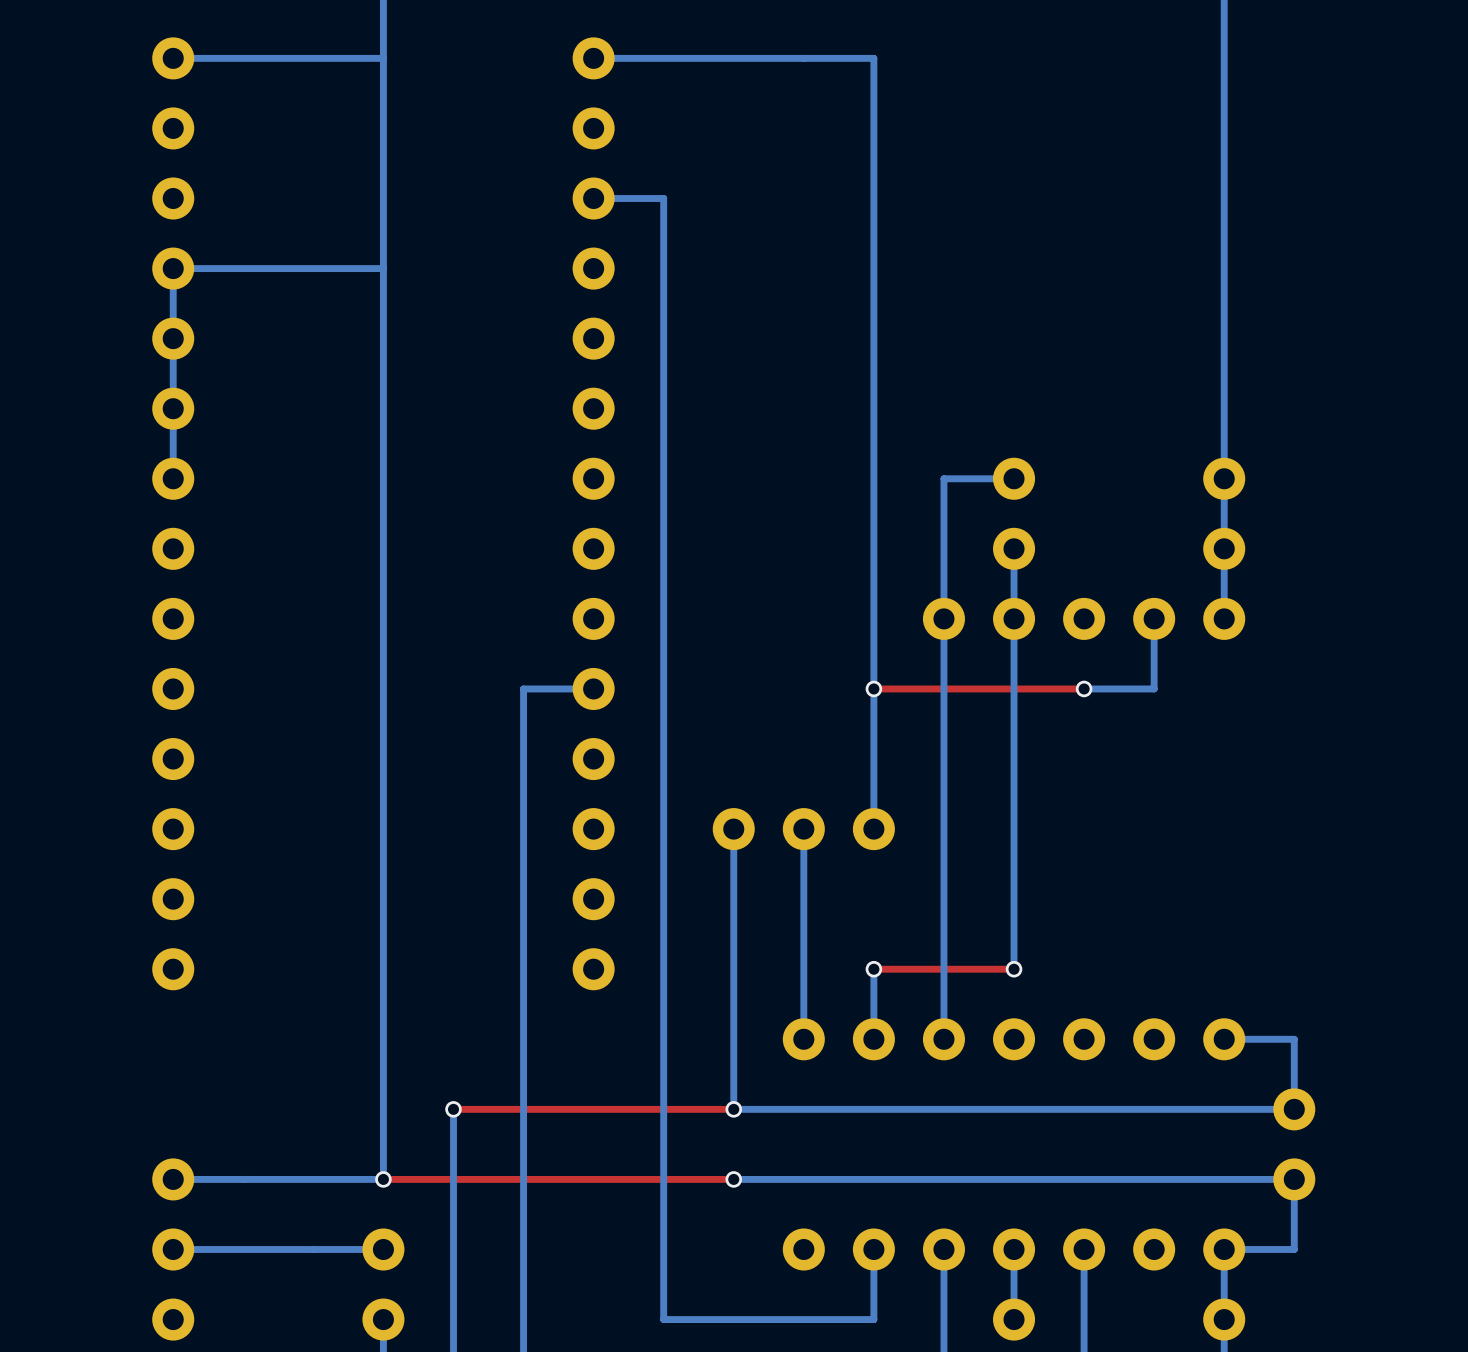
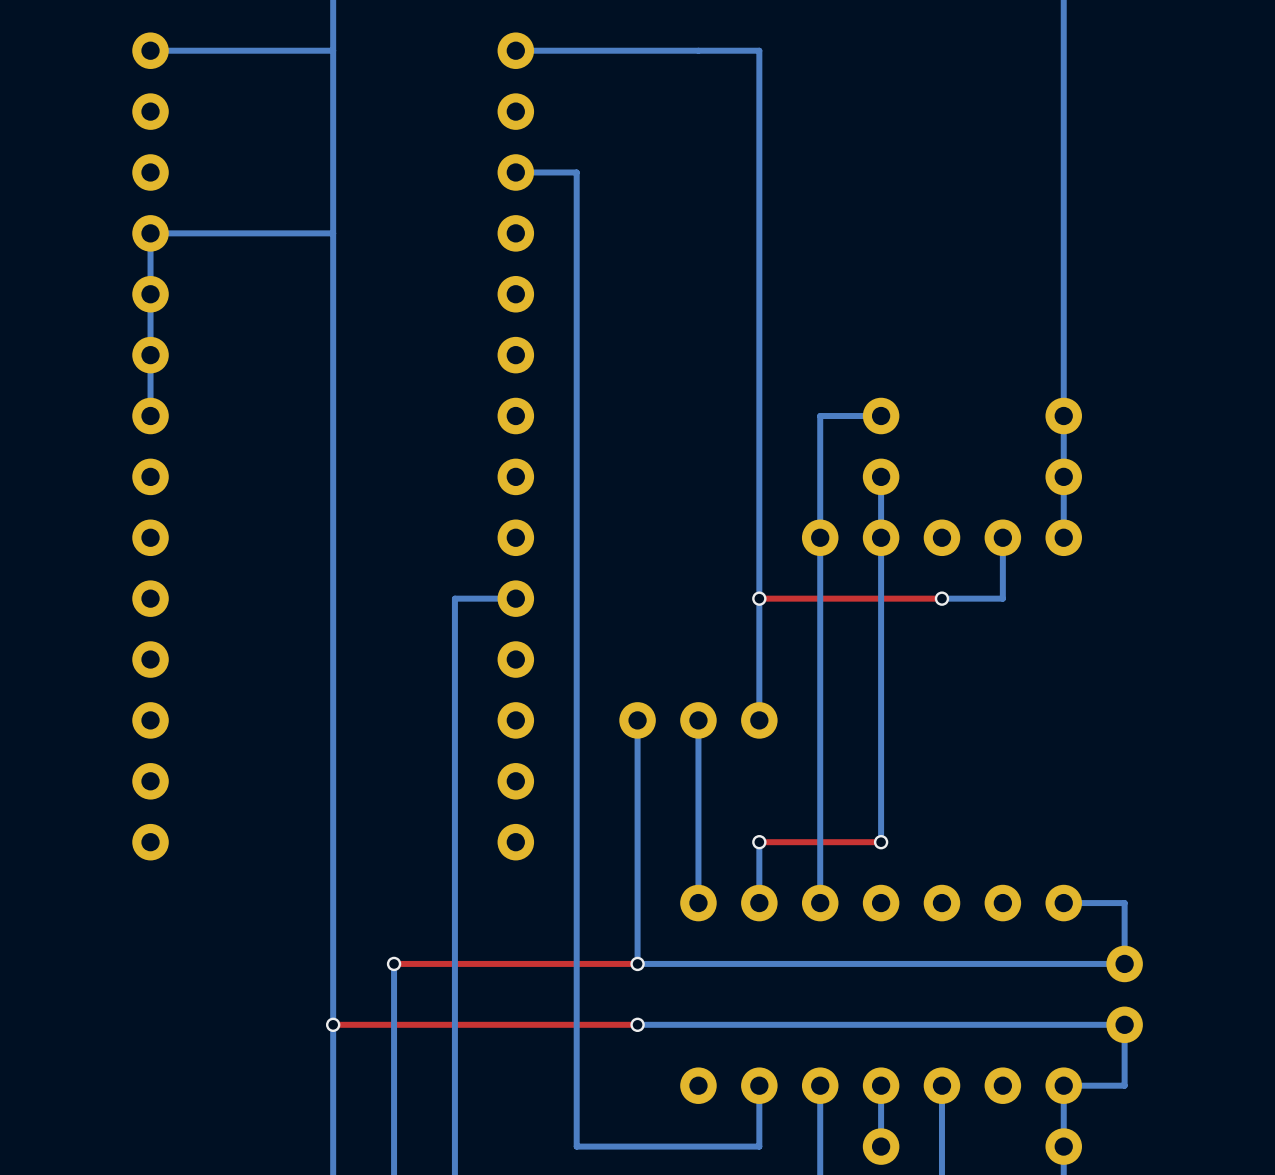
bottom track: (383, 1179) (173, 1179) -> (333, 1024) (333, 1146)
part: (173, 1249) -> none
bottom track: (383, 1249) (173, 1249) -> none
part: (383, 1284) -> none

